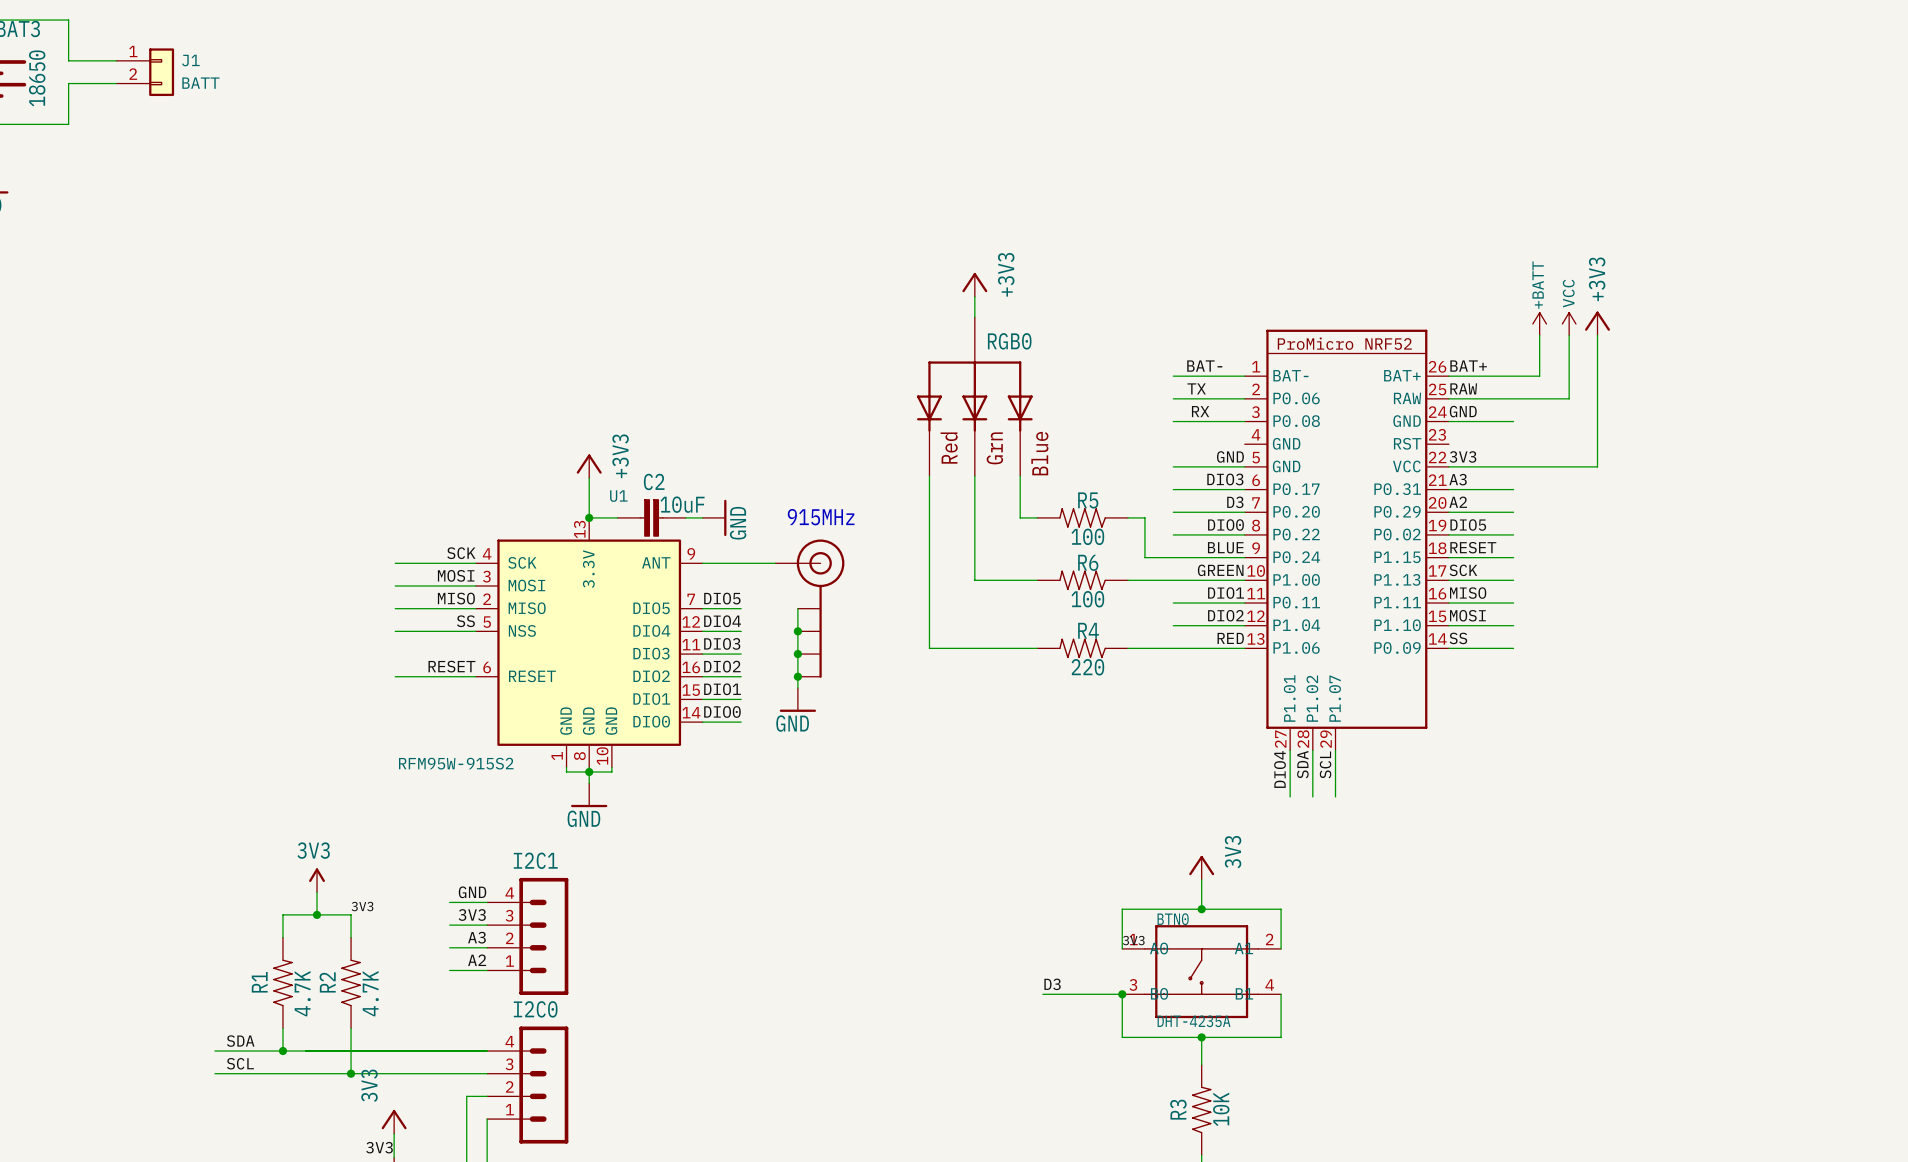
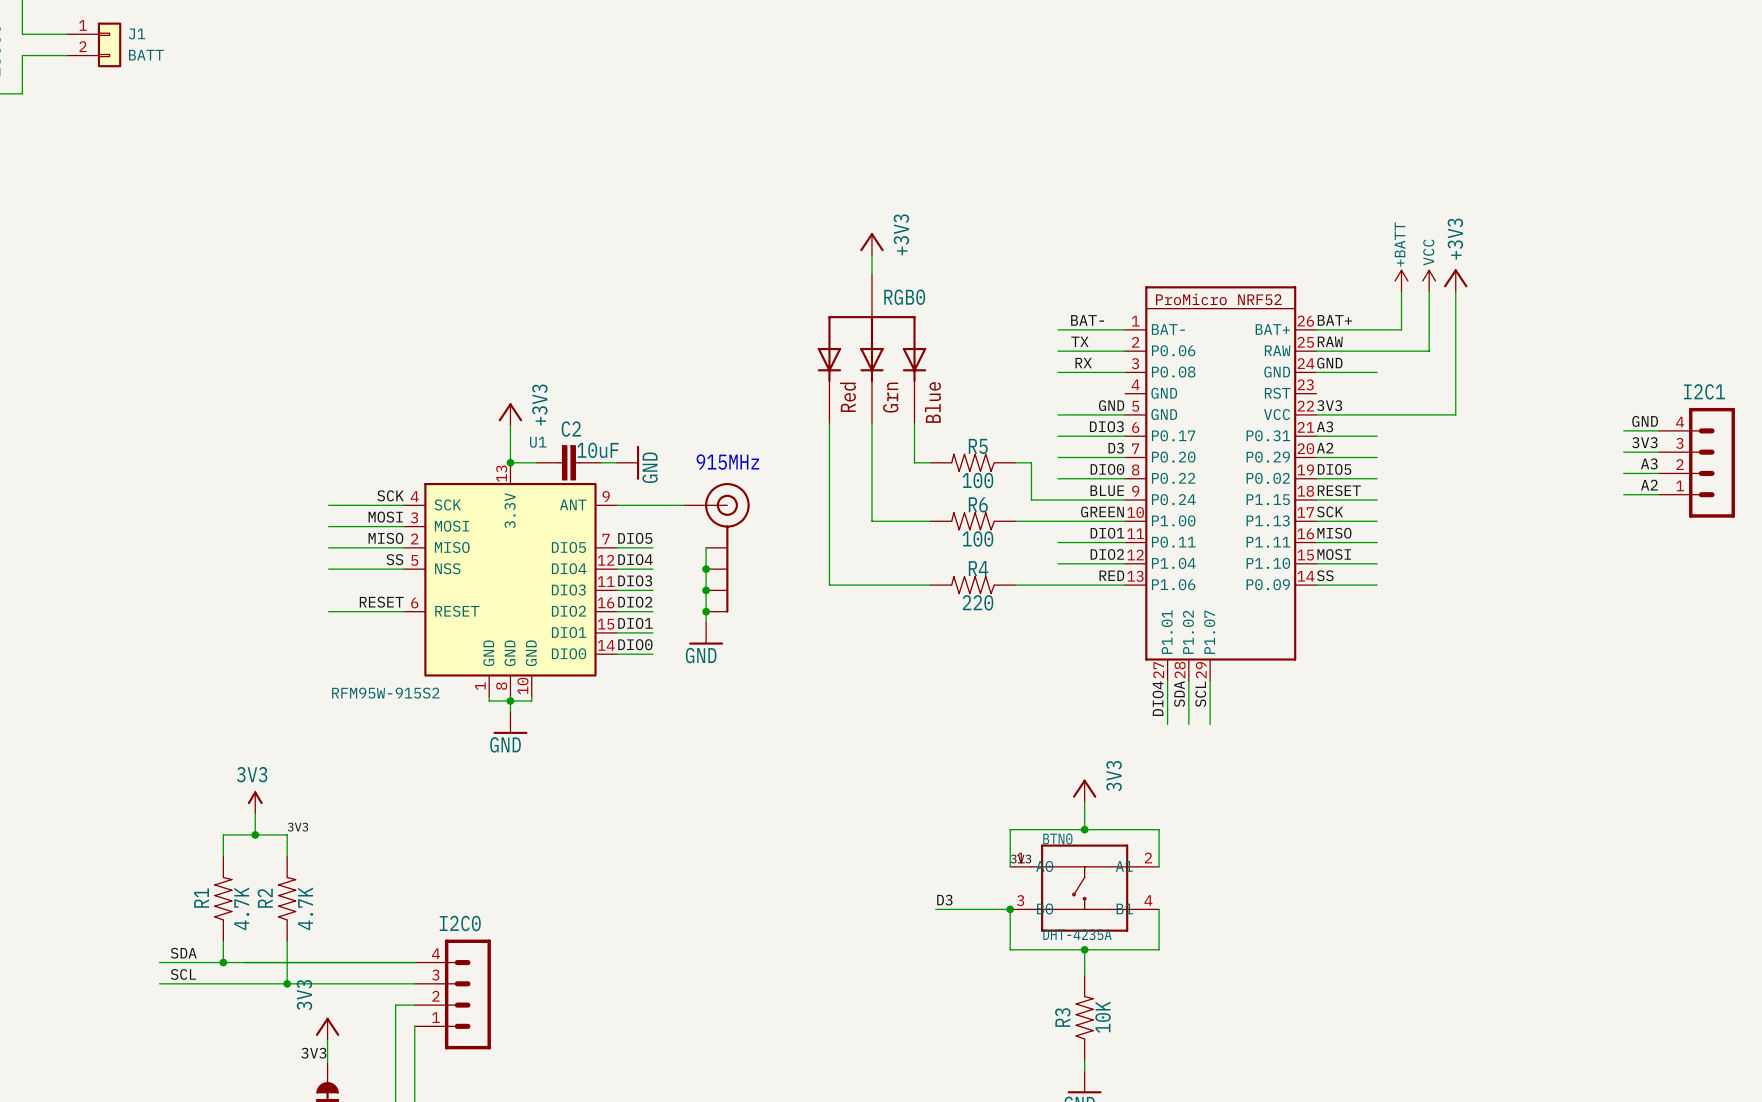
label: none -> GND (1645, 421)
wire: none -> (1623, 430) (1658, 430)
label: none -> 3V3 (1644, 442)
wire: none -> (1623, 452) (1658, 452)
label: none -> A3 (1649, 463)
wire: none -> (1623, 473) (1658, 473)
label: none -> A2 (1649, 485)
wire: none -> (1623, 494) (1658, 494)
label: GND (472, 892) -> none
wire: (449, 902) (487, 902) -> none
label: 3V3 (472, 914) -> none
wire: (449, 925) (487, 925) -> none
I2C1 position: (527, 936) -> (1696, 462)
label: A3 (476, 937) -> none
wire: (449, 947) (487, 947) -> none
label: A2 (477, 960) -> none
wire: (449, 970) (487, 970) -> none

